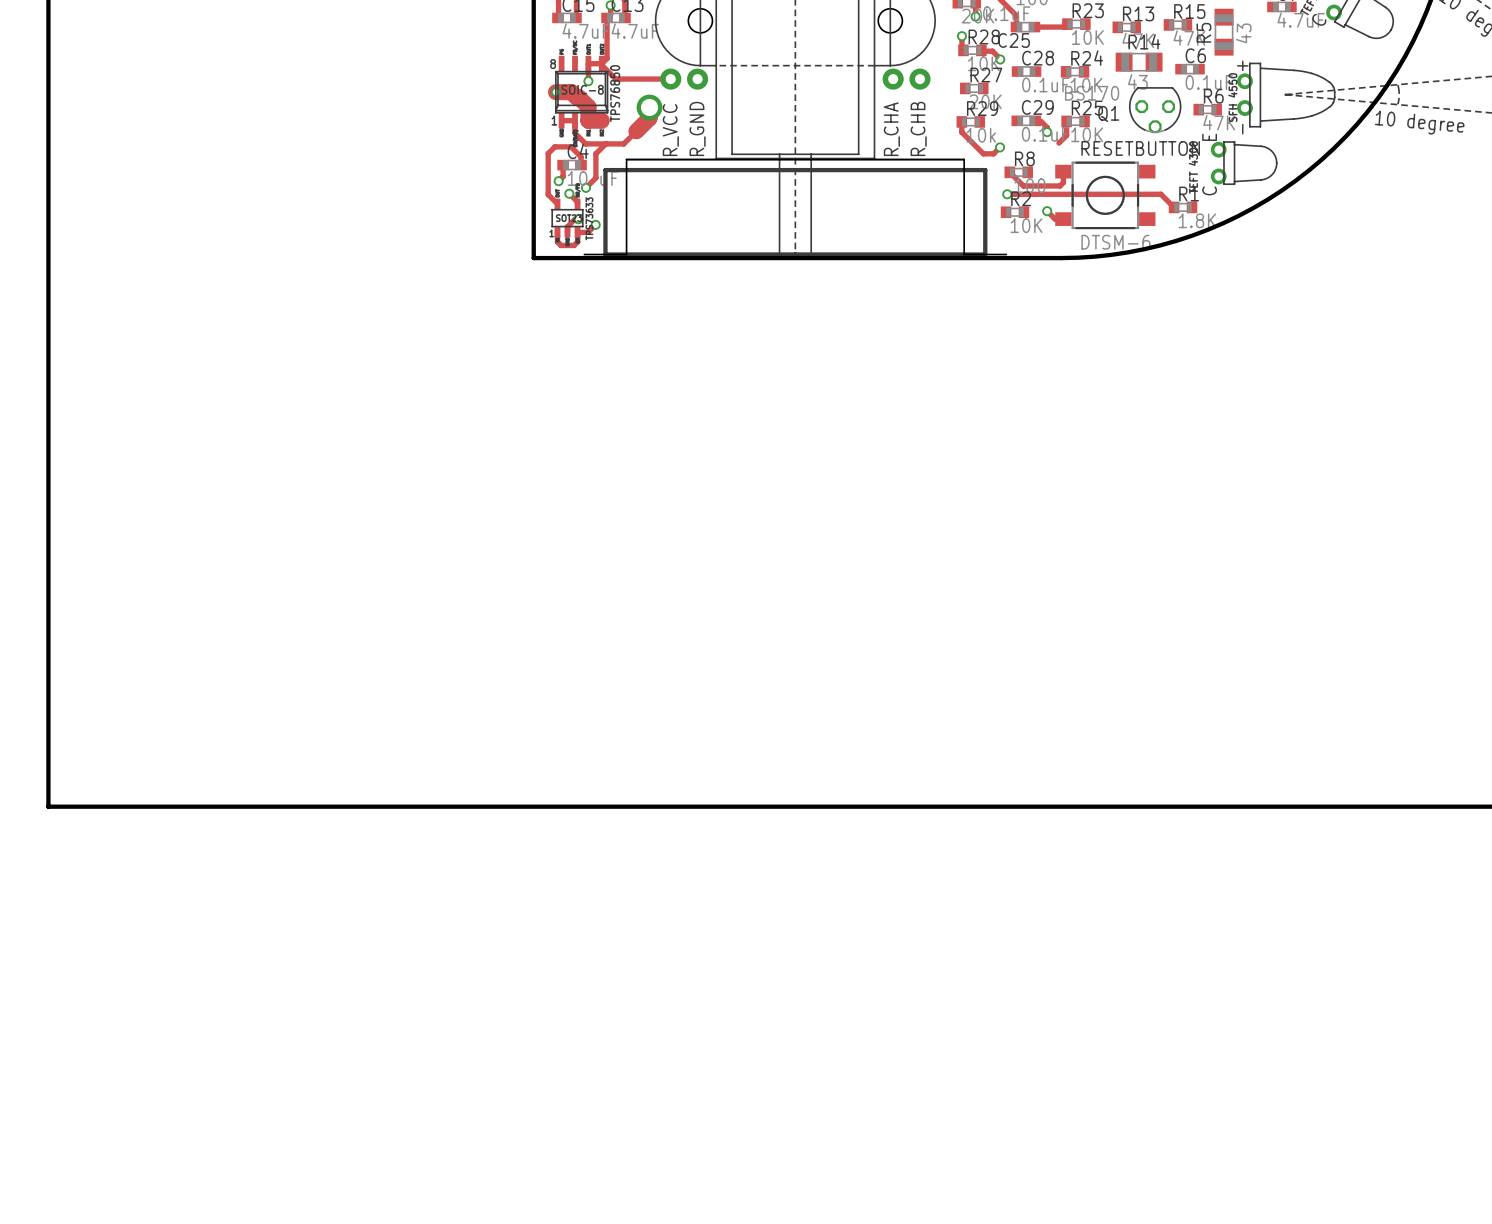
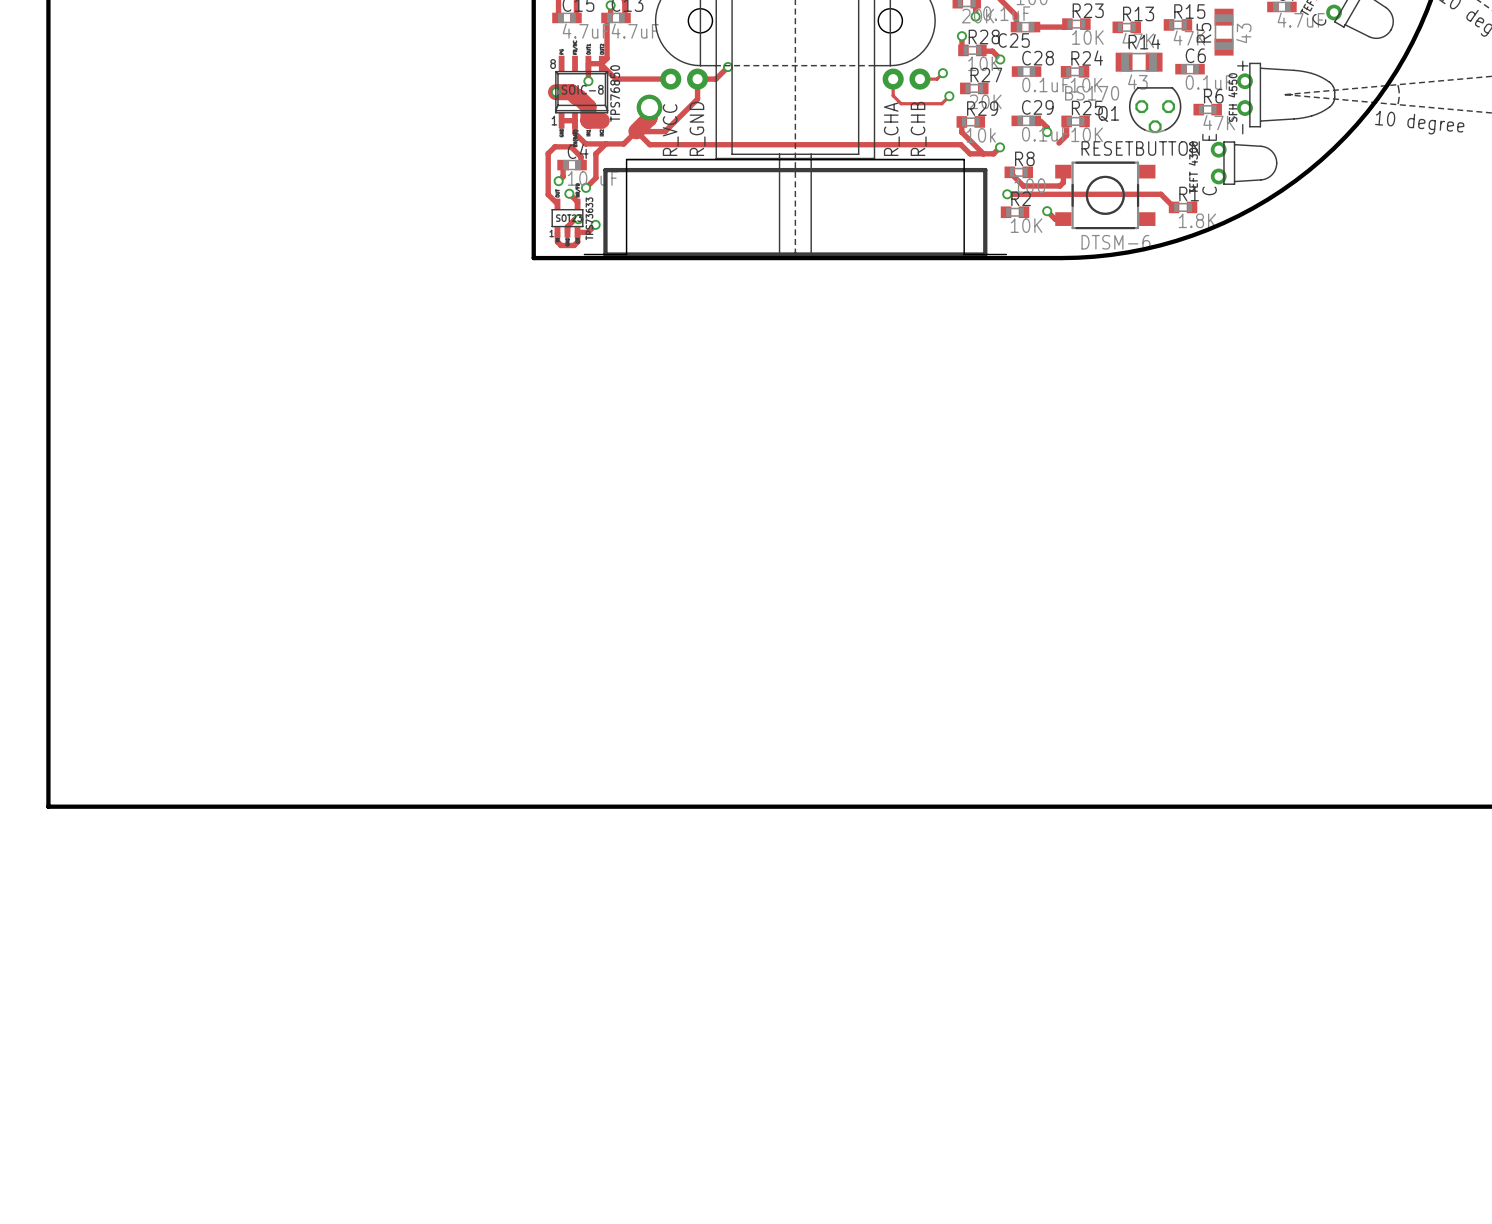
track: none -> (728, 67) (715, 79) (697, 79) (697, 99) (665, 131) (636, 131)
via: none -> (728, 67)
track: none -> (942, 73) (937, 79) (919, 79)
via: none -> (942, 73)
track: none -> (893, 79) (893, 95) (901, 103) (941, 103) (949, 96)
via: none -> (949, 96)
track: none -> (636, 134) (636, 131) (649, 144) (960, 144) (970, 153) (983, 153)

